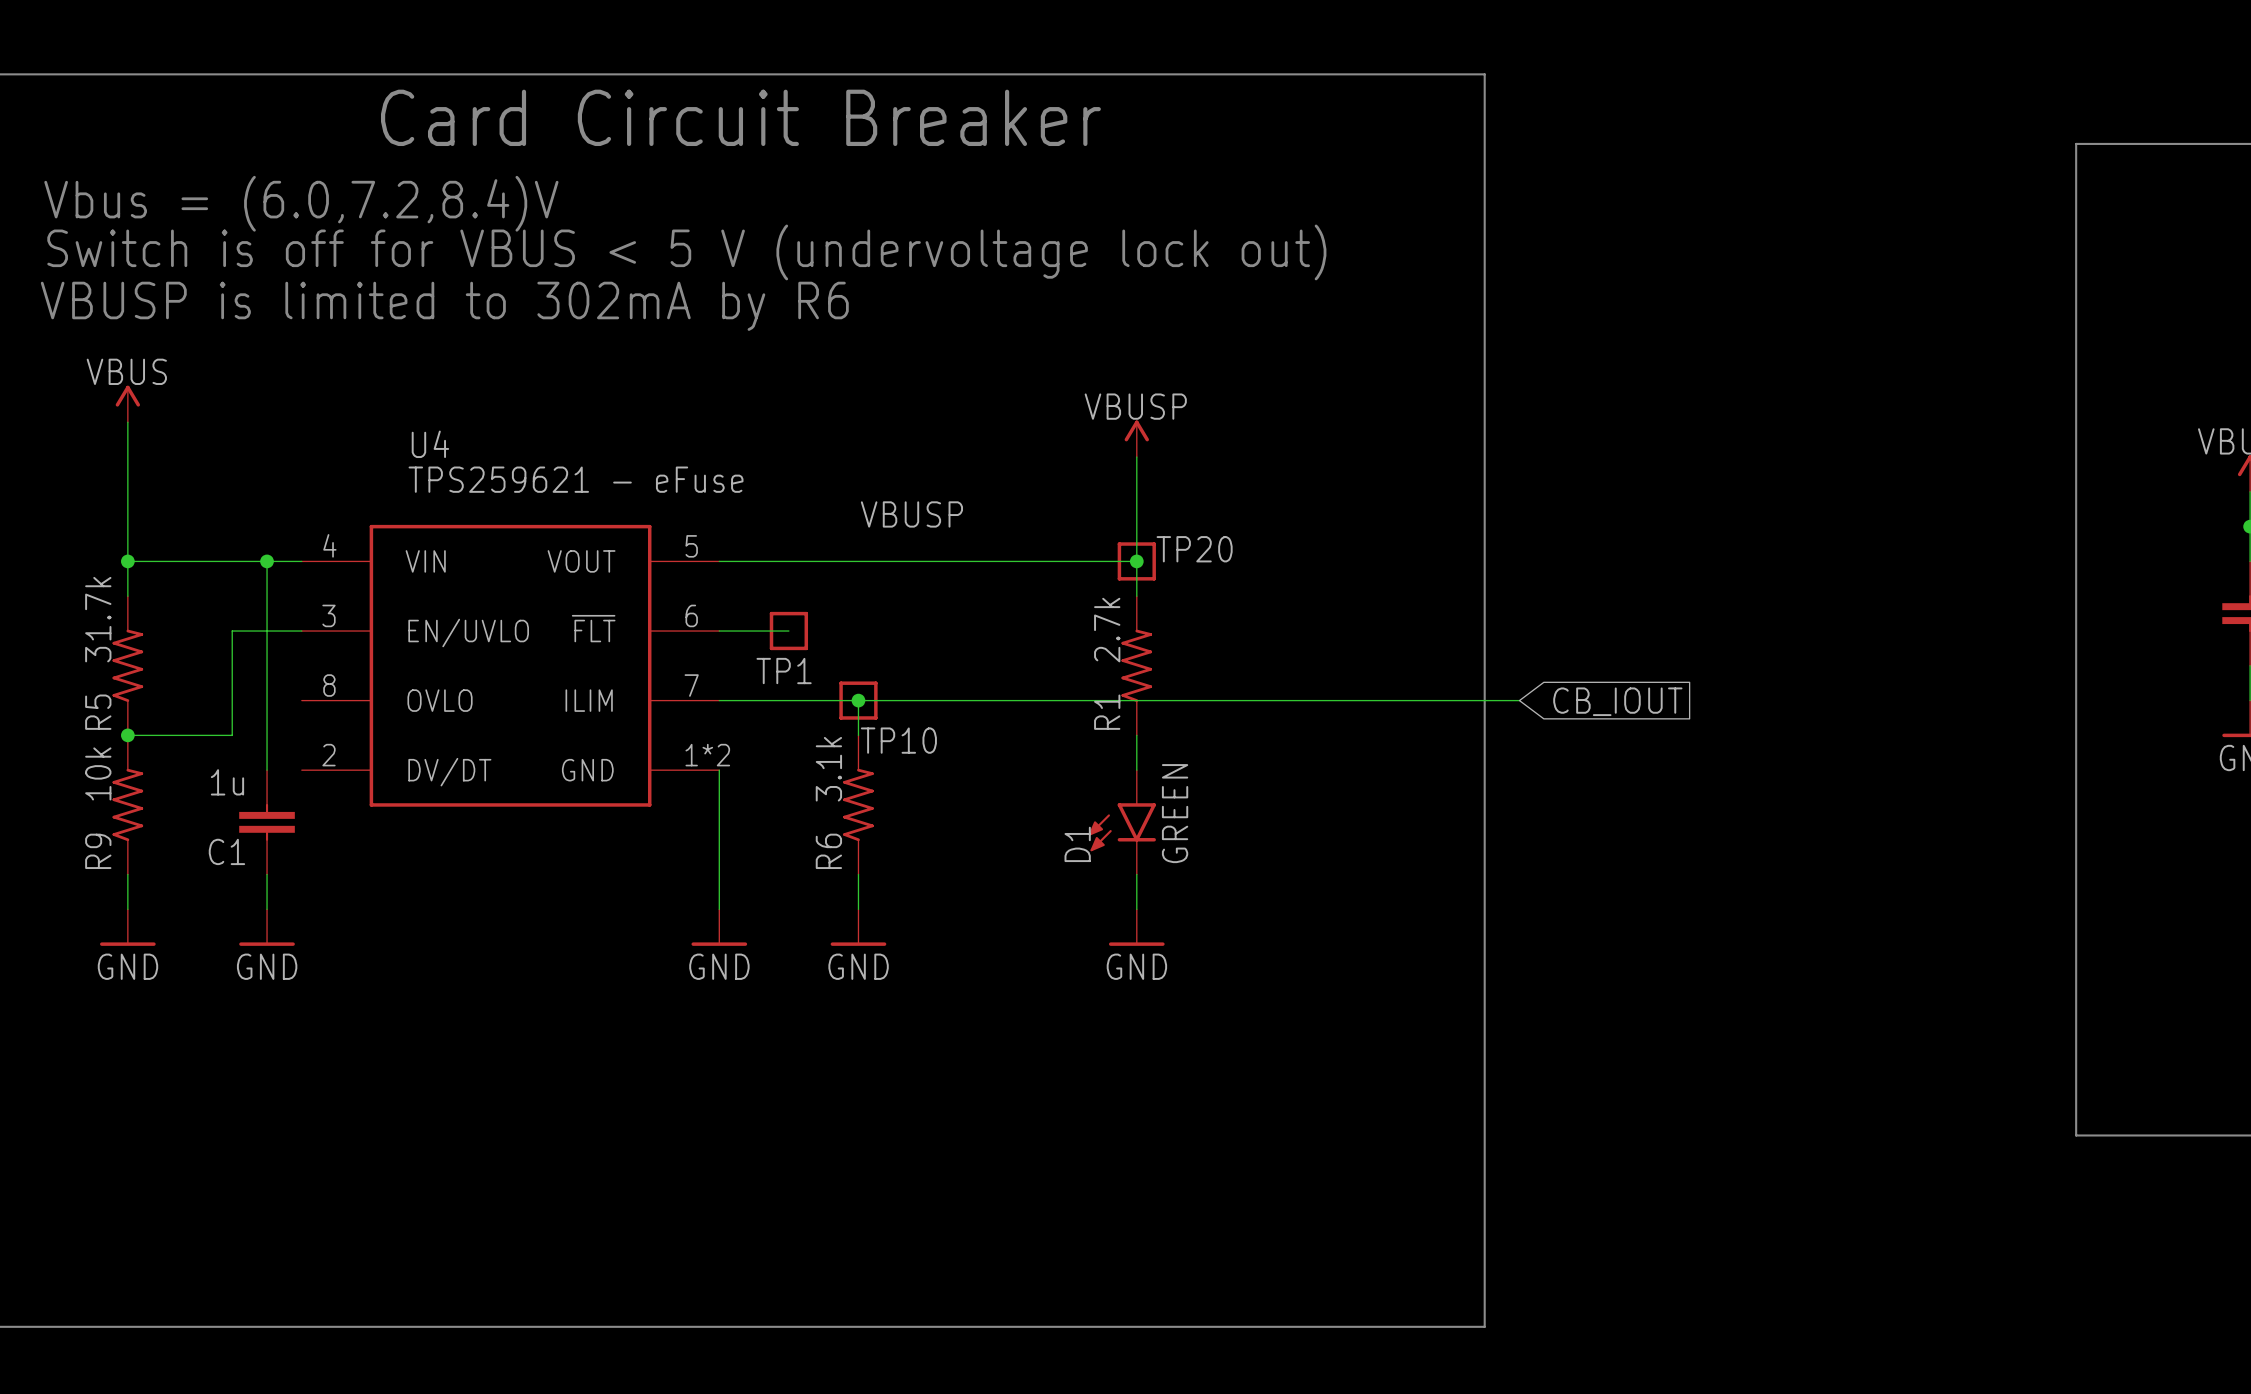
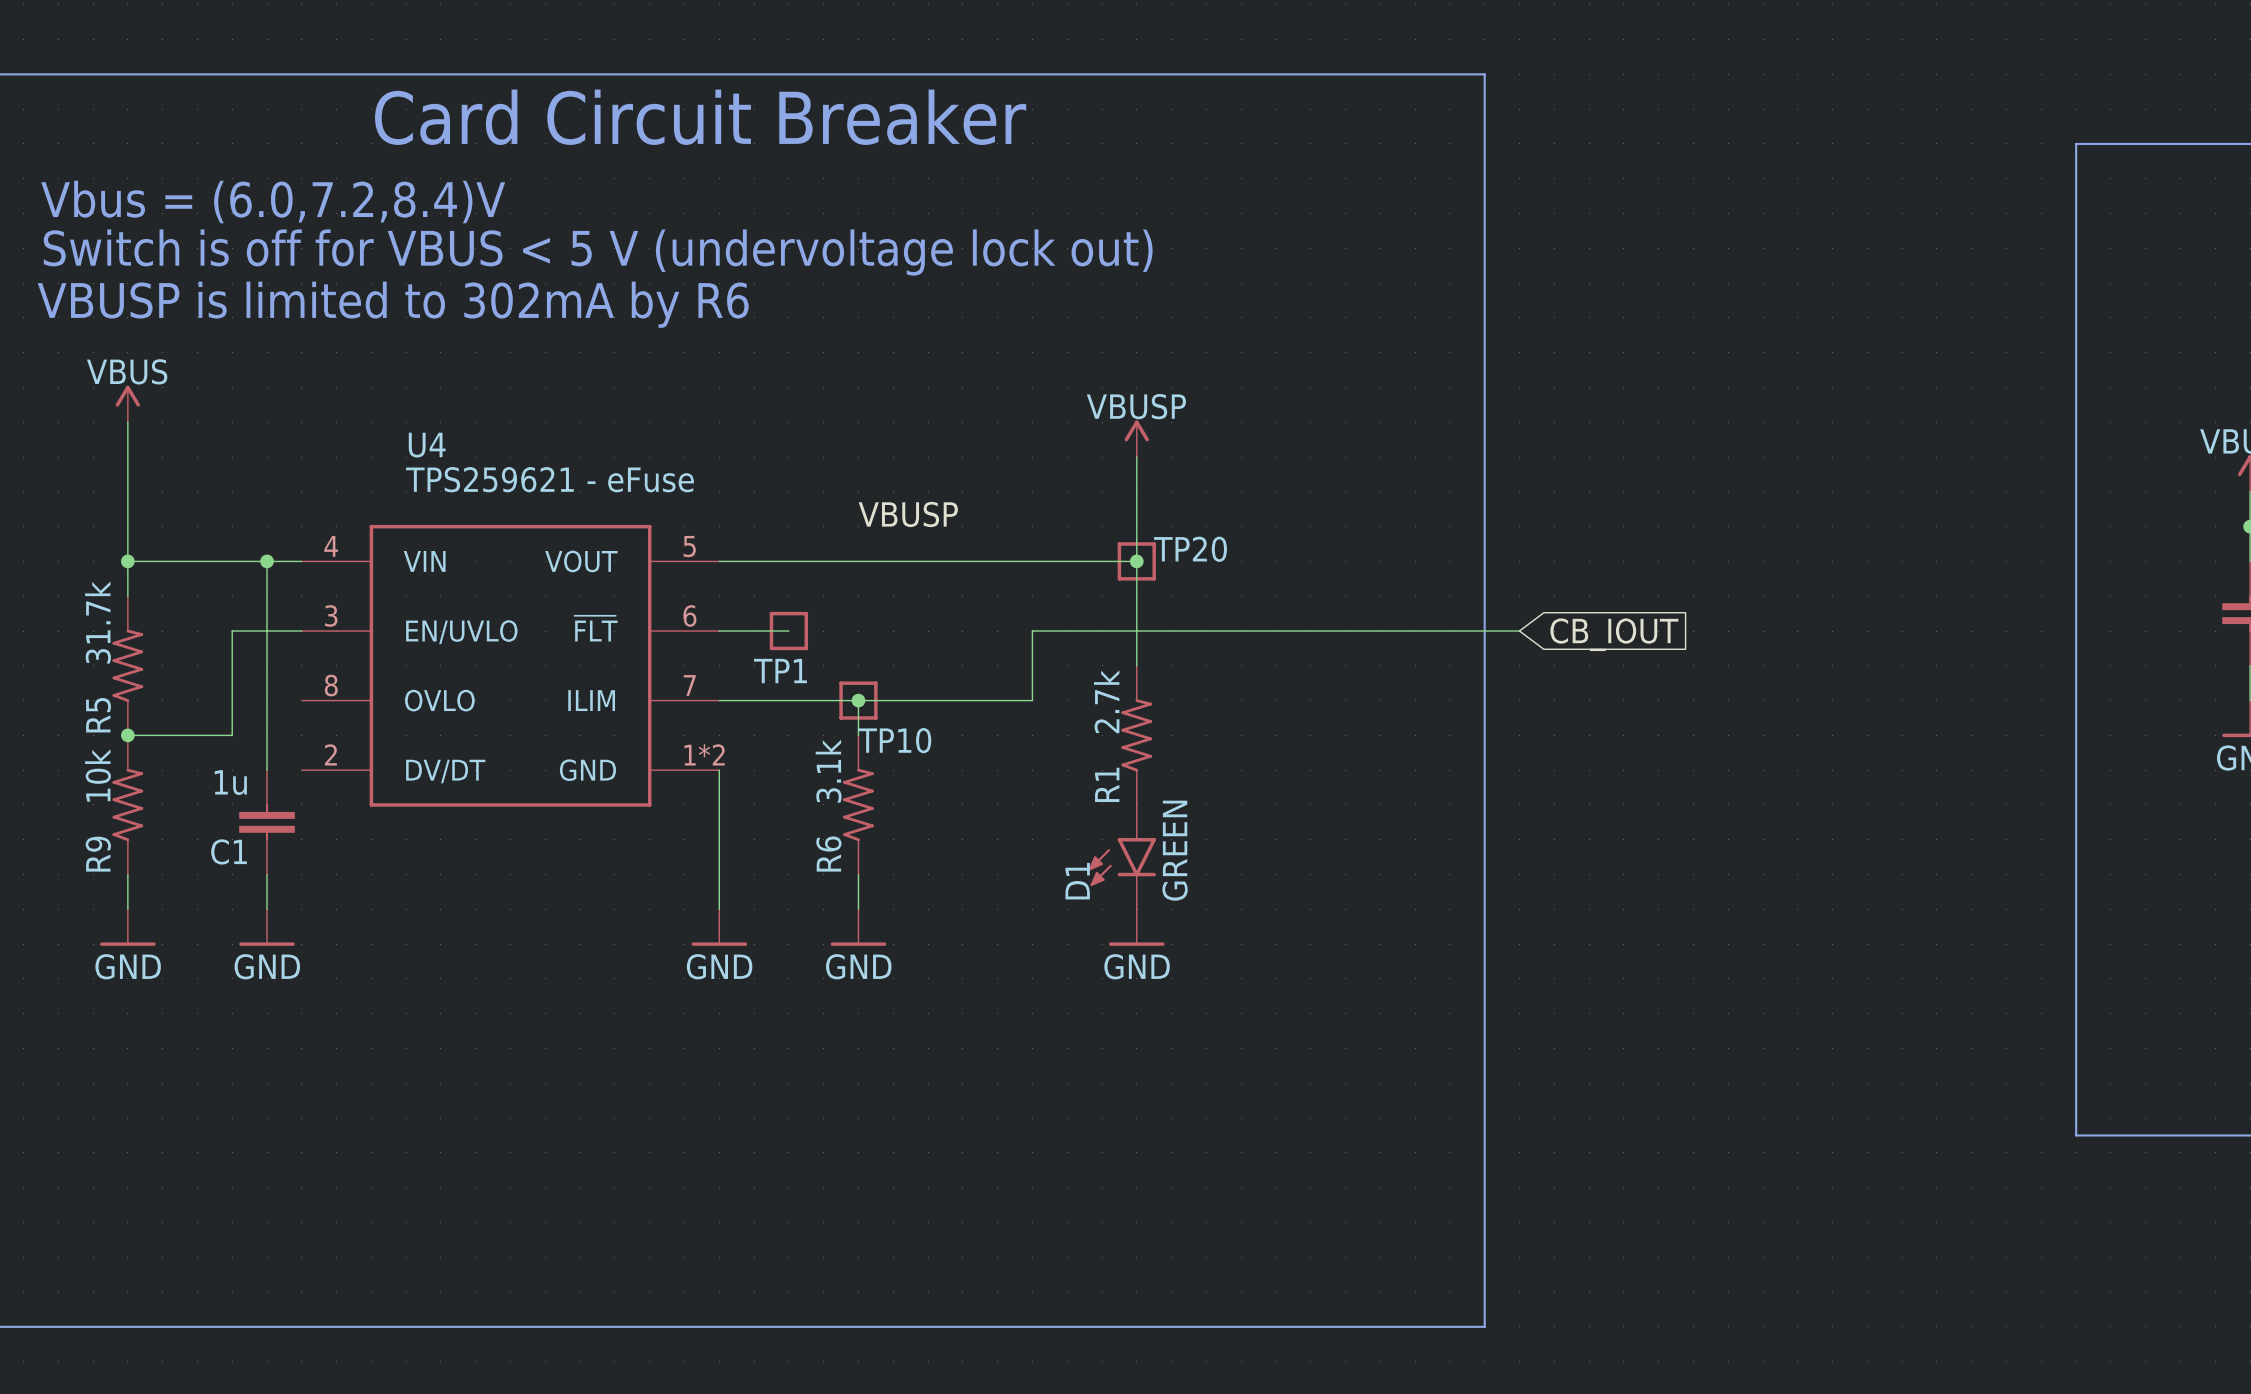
R1 position: (1136, 665) -> (1136, 735)
wire: (1032, 700) (1519, 700) -> (1032, 700) (1032, 631) (1519, 631)
global label position: CB_IOUT (1617, 701) -> CB_IOUT (1614, 634)
wire: (1136, 735) (1136, 770) -> none
D1 position: (1122, 822) -> (1122, 857)

